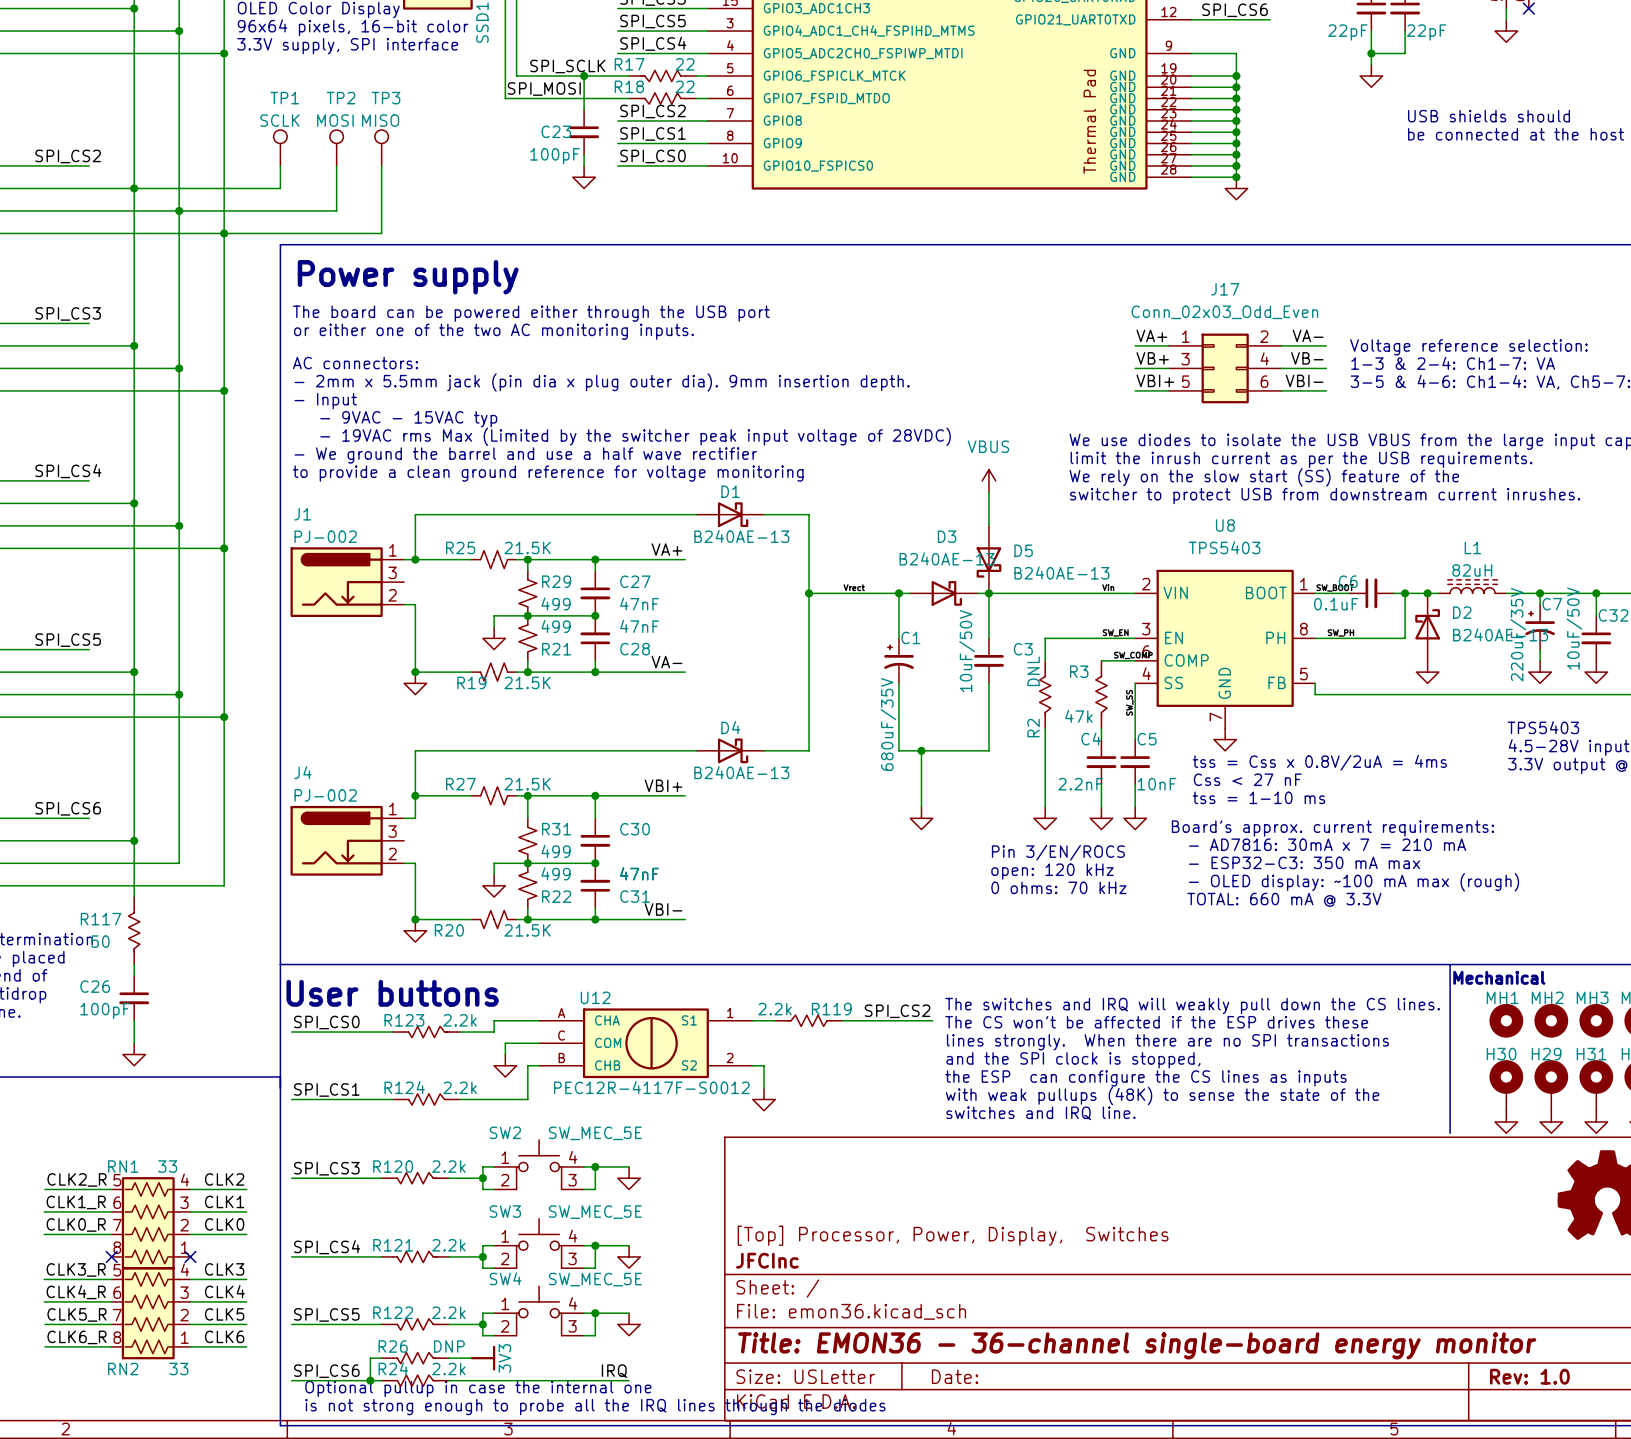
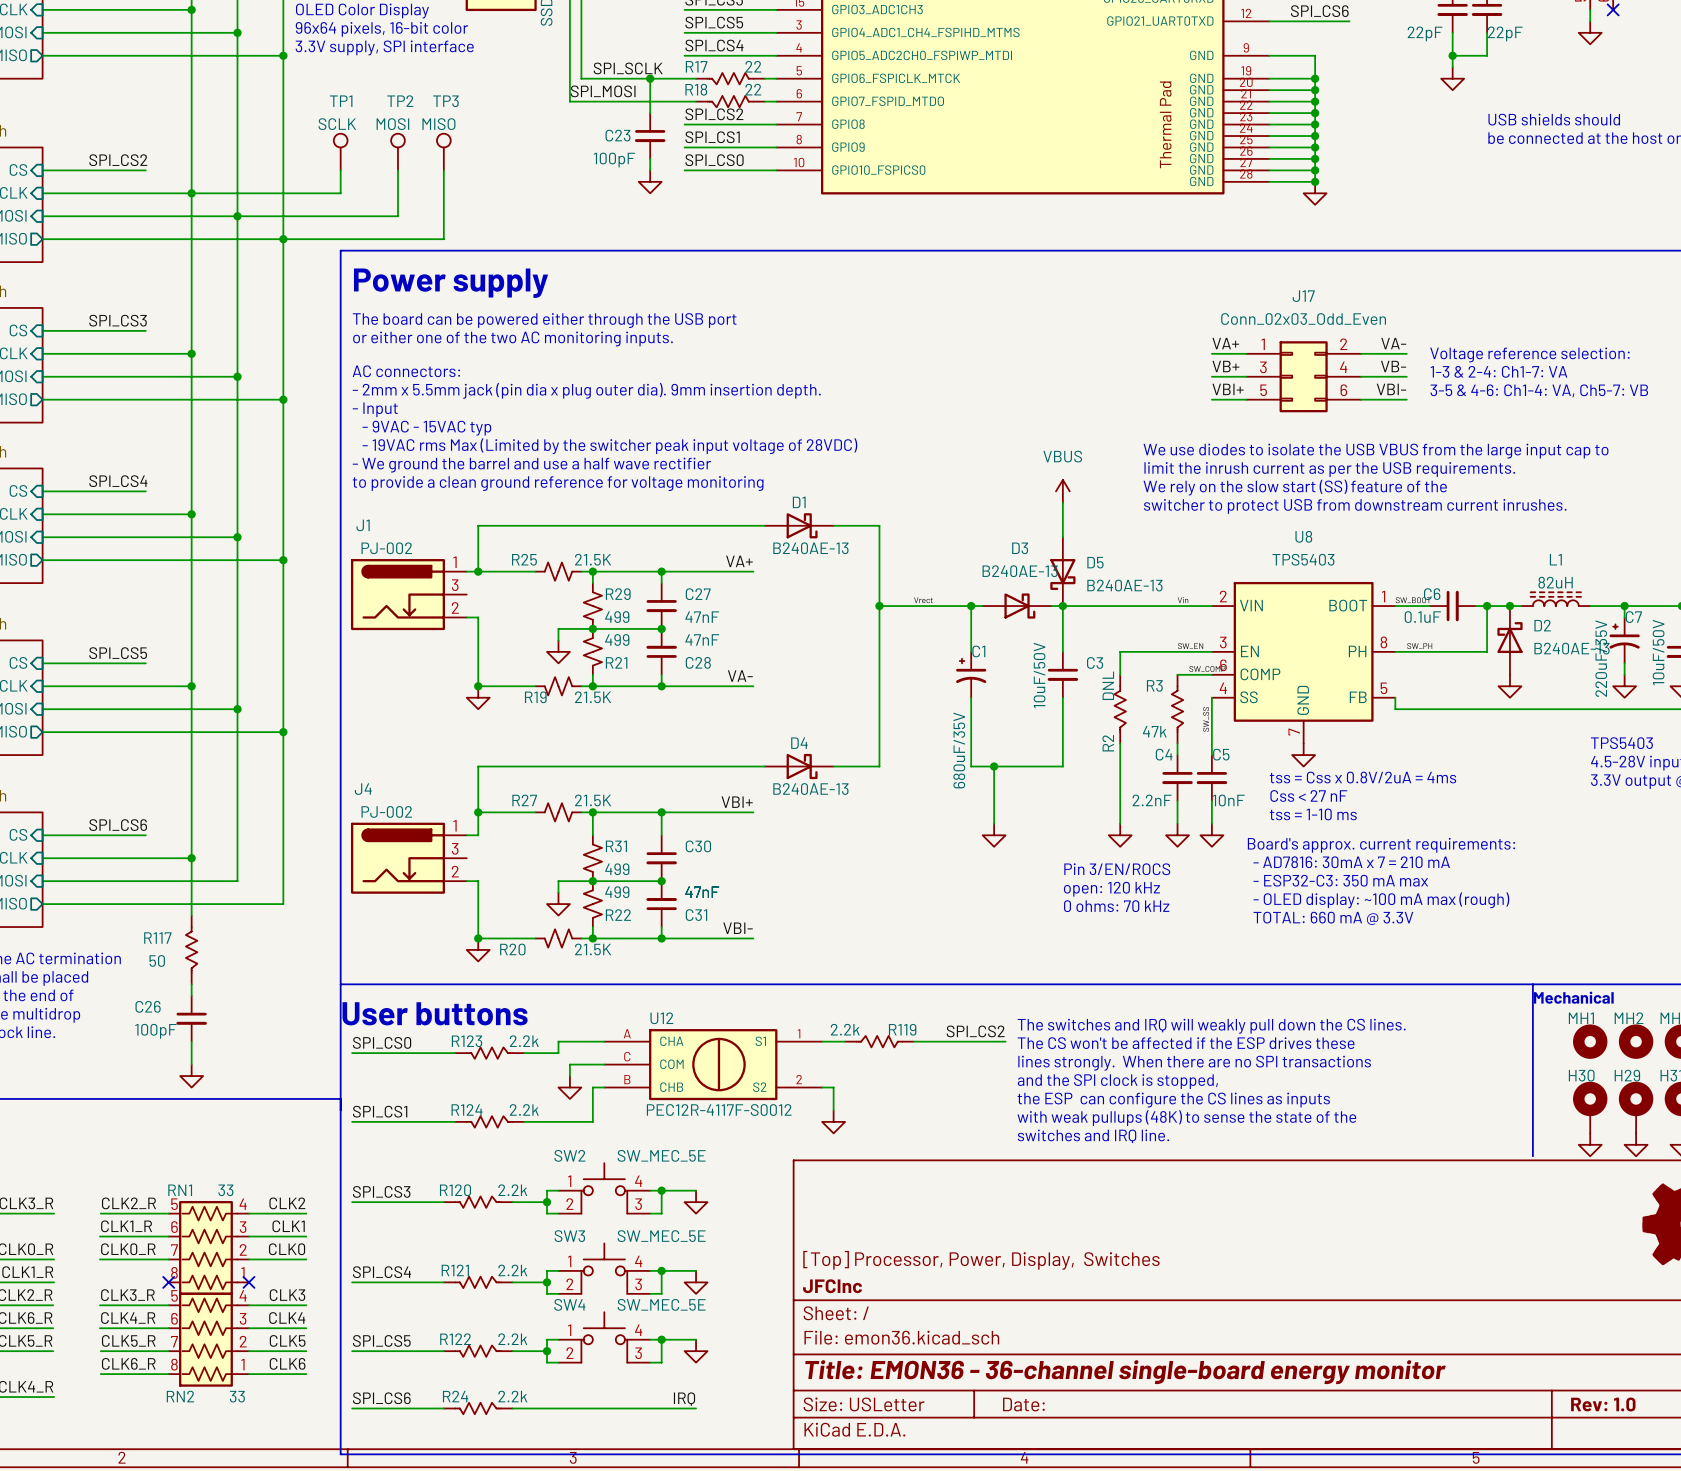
wire: (381, 1358) (370, 1358) (370, 1380) -> none
R26: DNP (415, 1358) -> none
wire: (449, 1358) (471, 1358) -> none
power symbol: 3V3 (482, 1358) -> none
junction: (370, 1380) -> none
text: Optional pullup in case the internal one (478, 1388) -> none
text: is not strong enough to probe all the IRQ lines through the diodes (595, 1407) -> none

